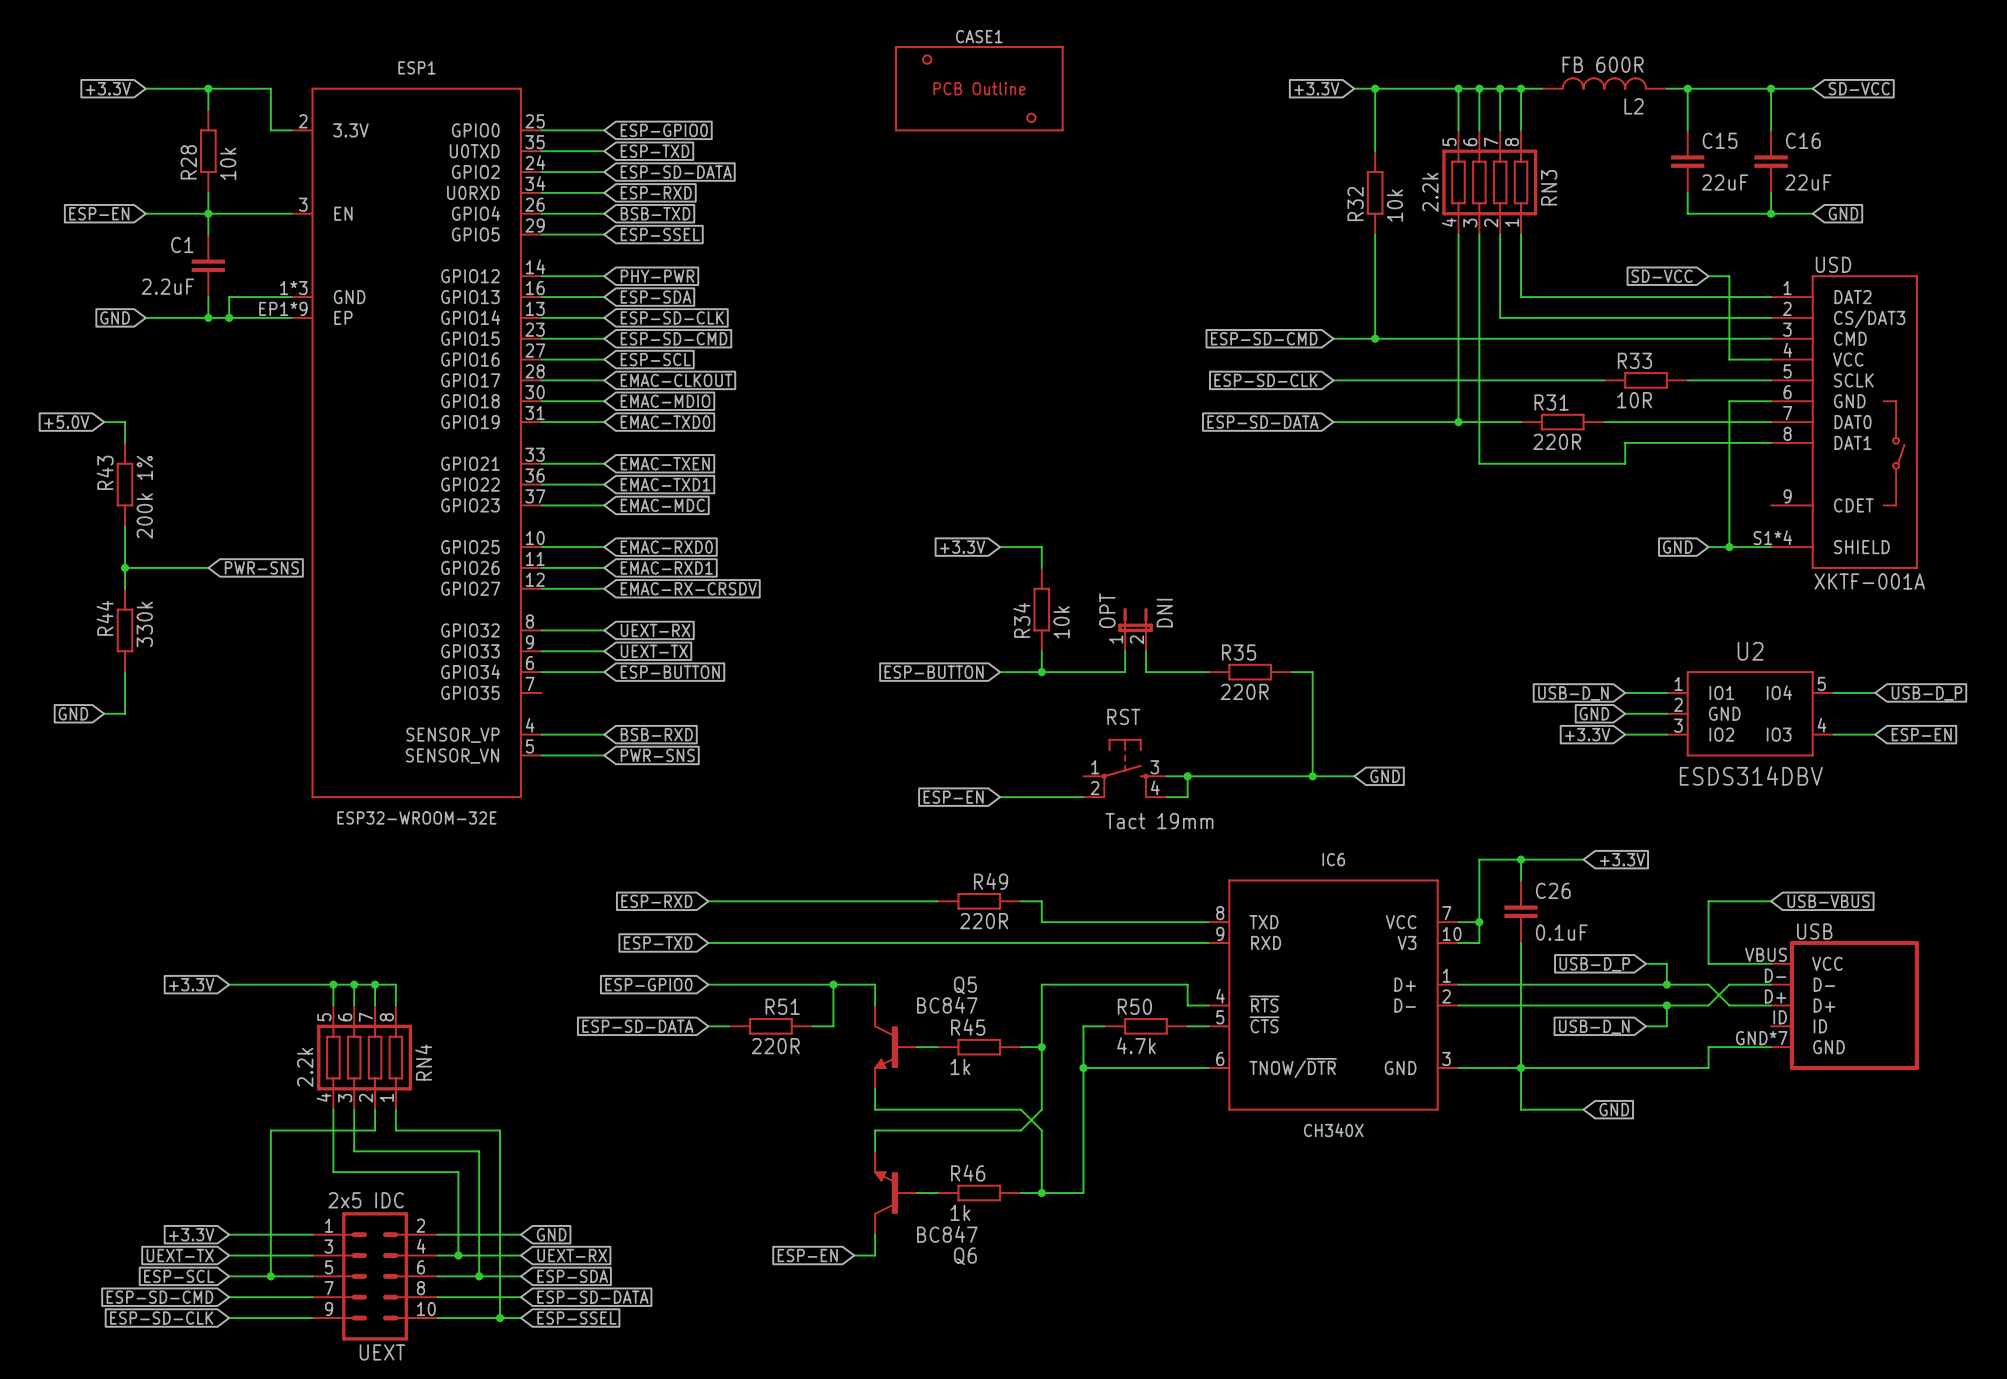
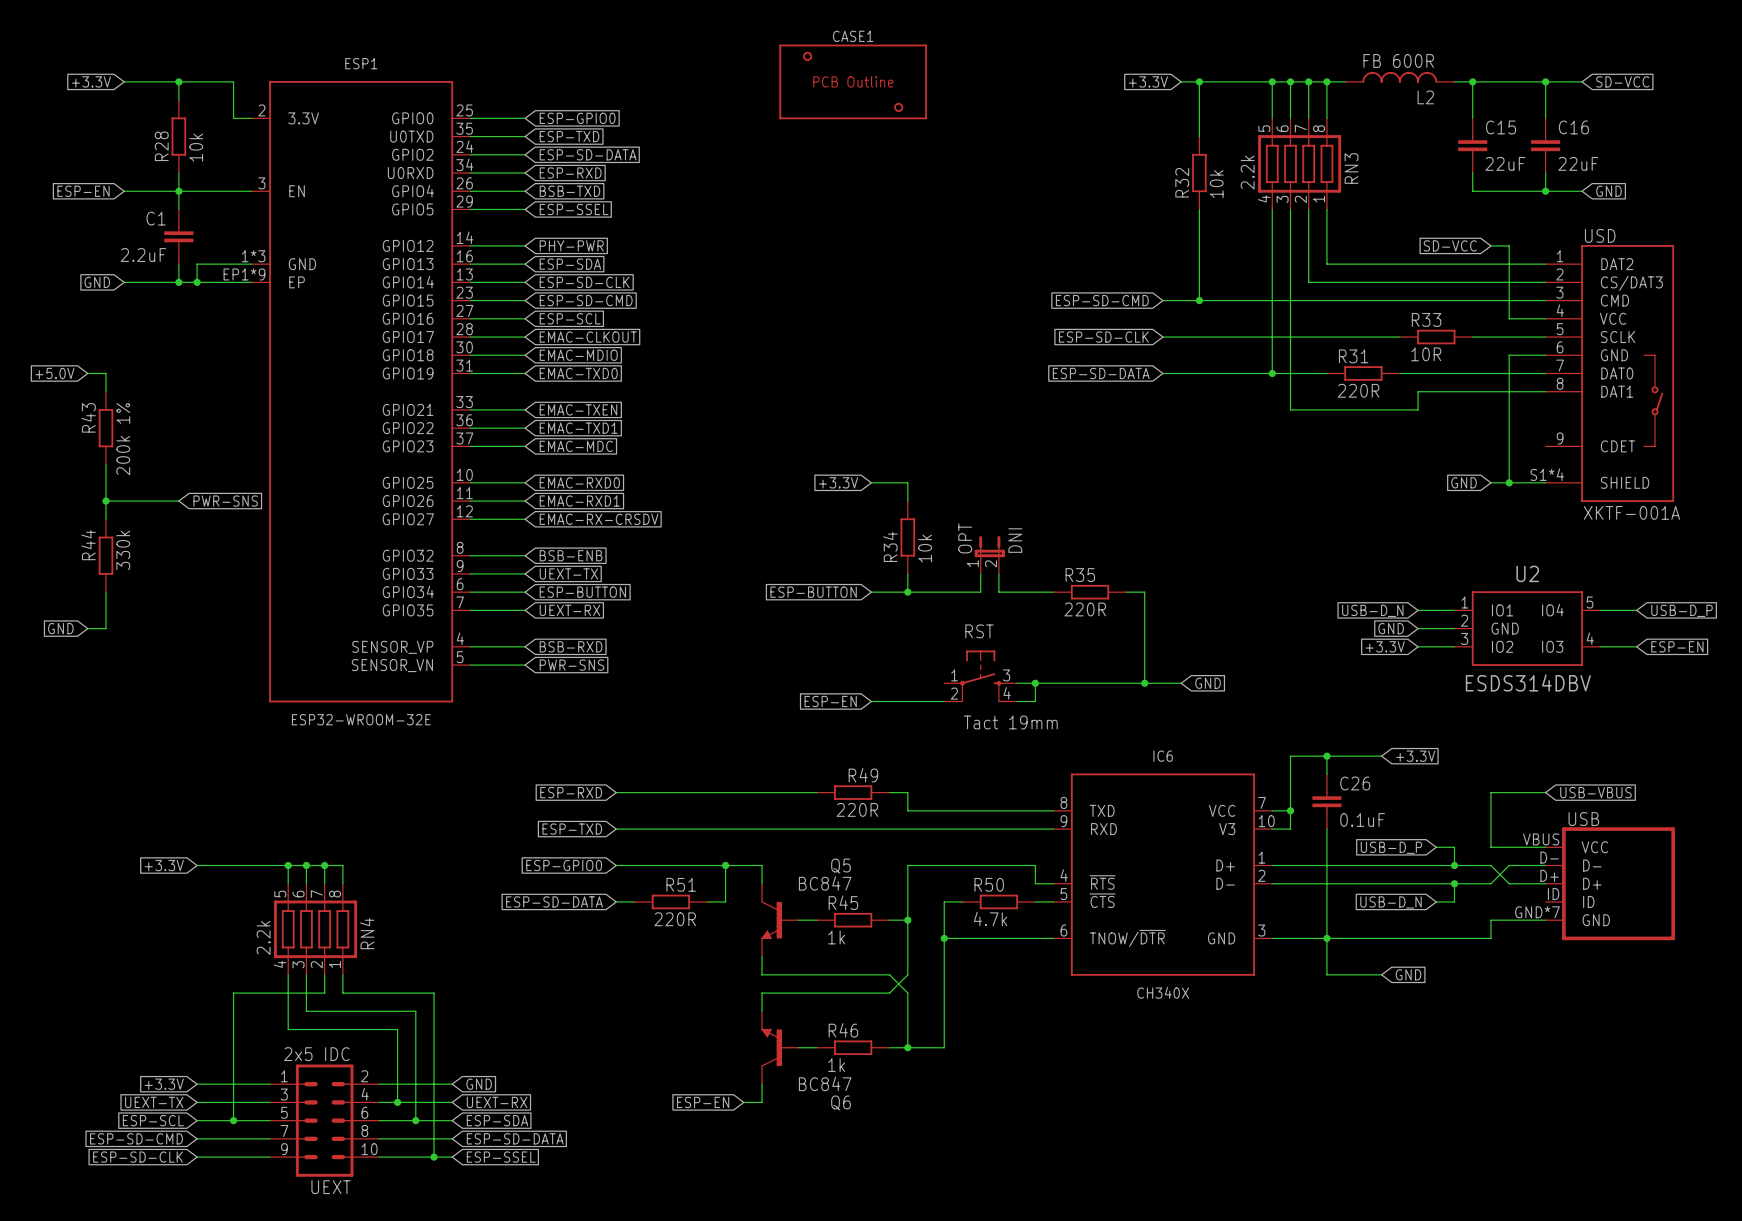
global label: UEXT-RX (655, 630) -> BSB-ENB (571, 555)
wire: none -> (470, 610) (525, 610)
global label: none -> UEXT-RX (569, 610)

